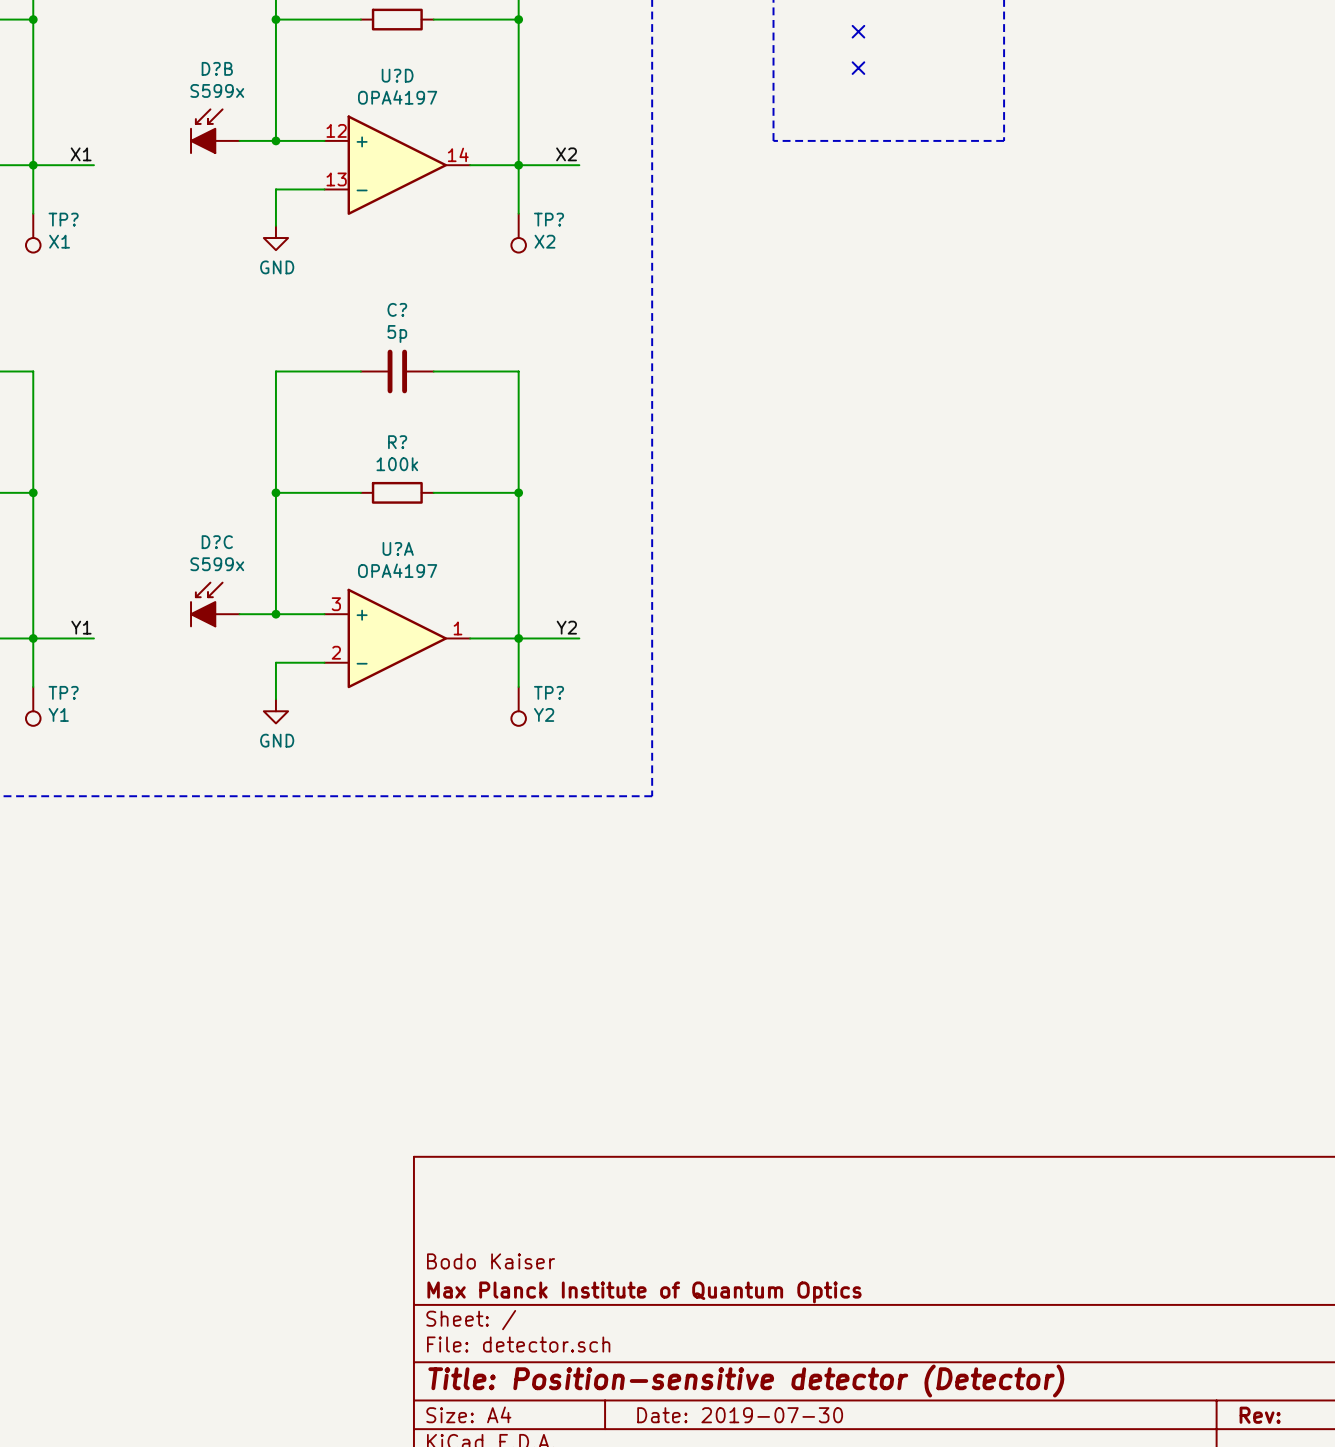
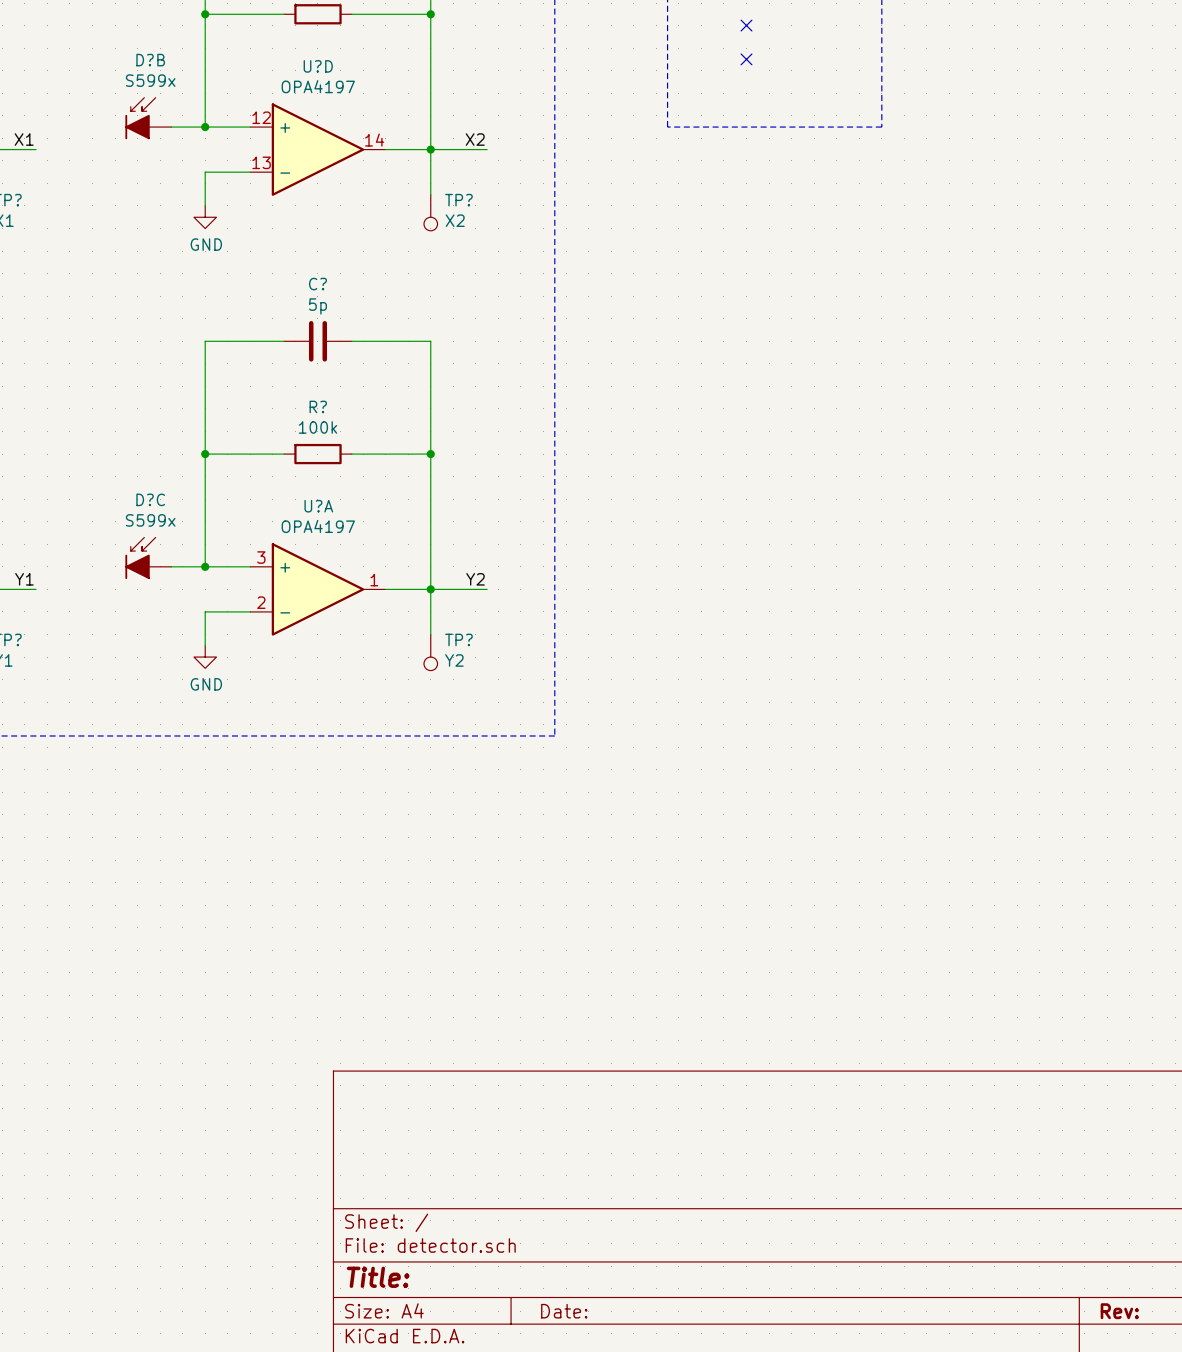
title block: Bodo Kaiser (491, 1261) -> none
title block: Max Planck Institute of Quantum Optics (644, 1292) -> none
title block: Title: Position-sensitive detector (Detector) (746, 1381) -> Title: (378, 1277)
title block: Date: 2019-07-30 (740, 1415) -> Date: (564, 1311)

